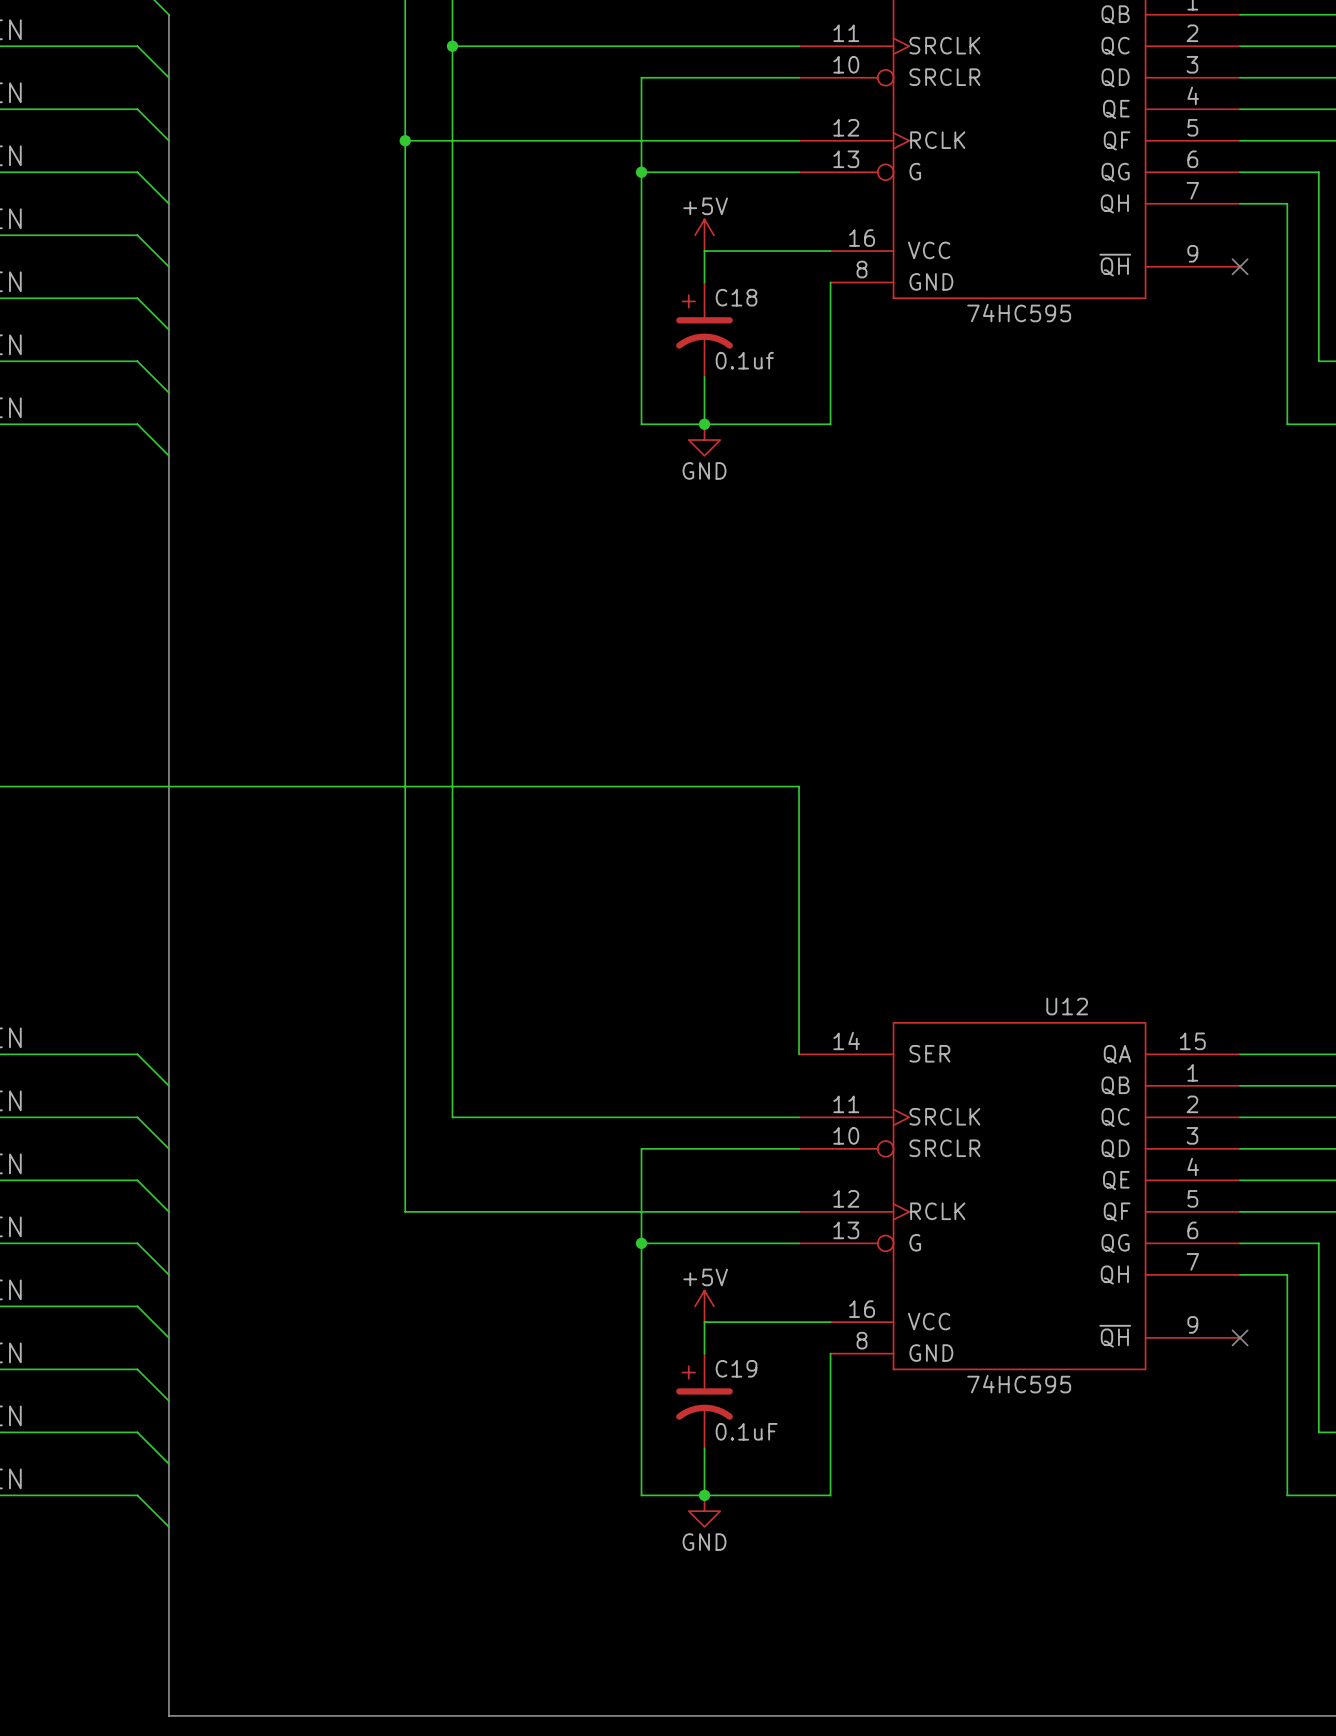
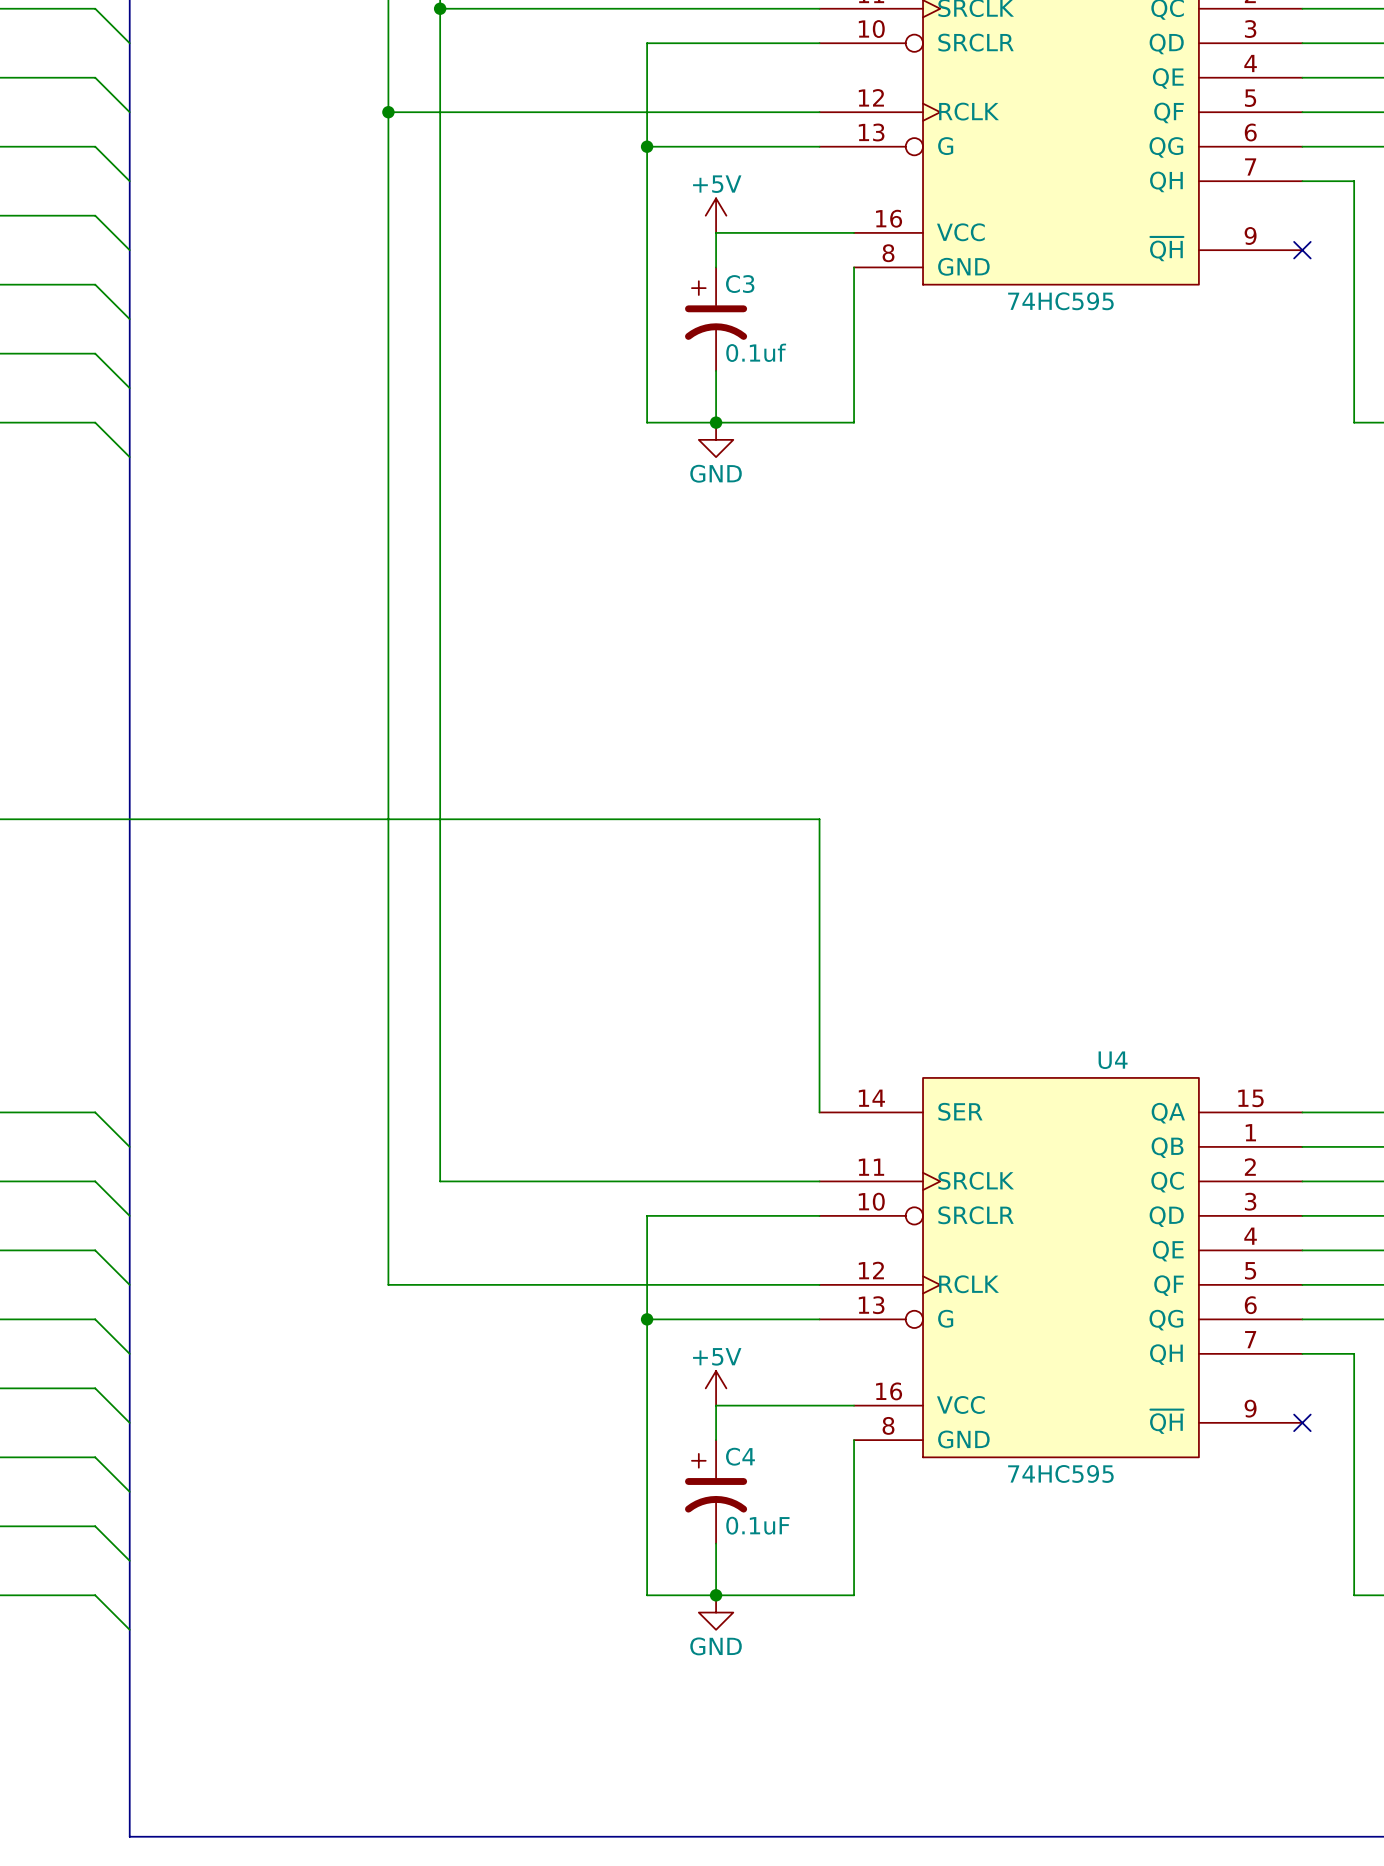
C18 name: C18 (736, 297) -> C3 (740, 284)
U12 name: U12 (1067, 1006) -> U4 (1113, 1060)
C19 name: C19 (736, 1368) -> C4 (740, 1456)

